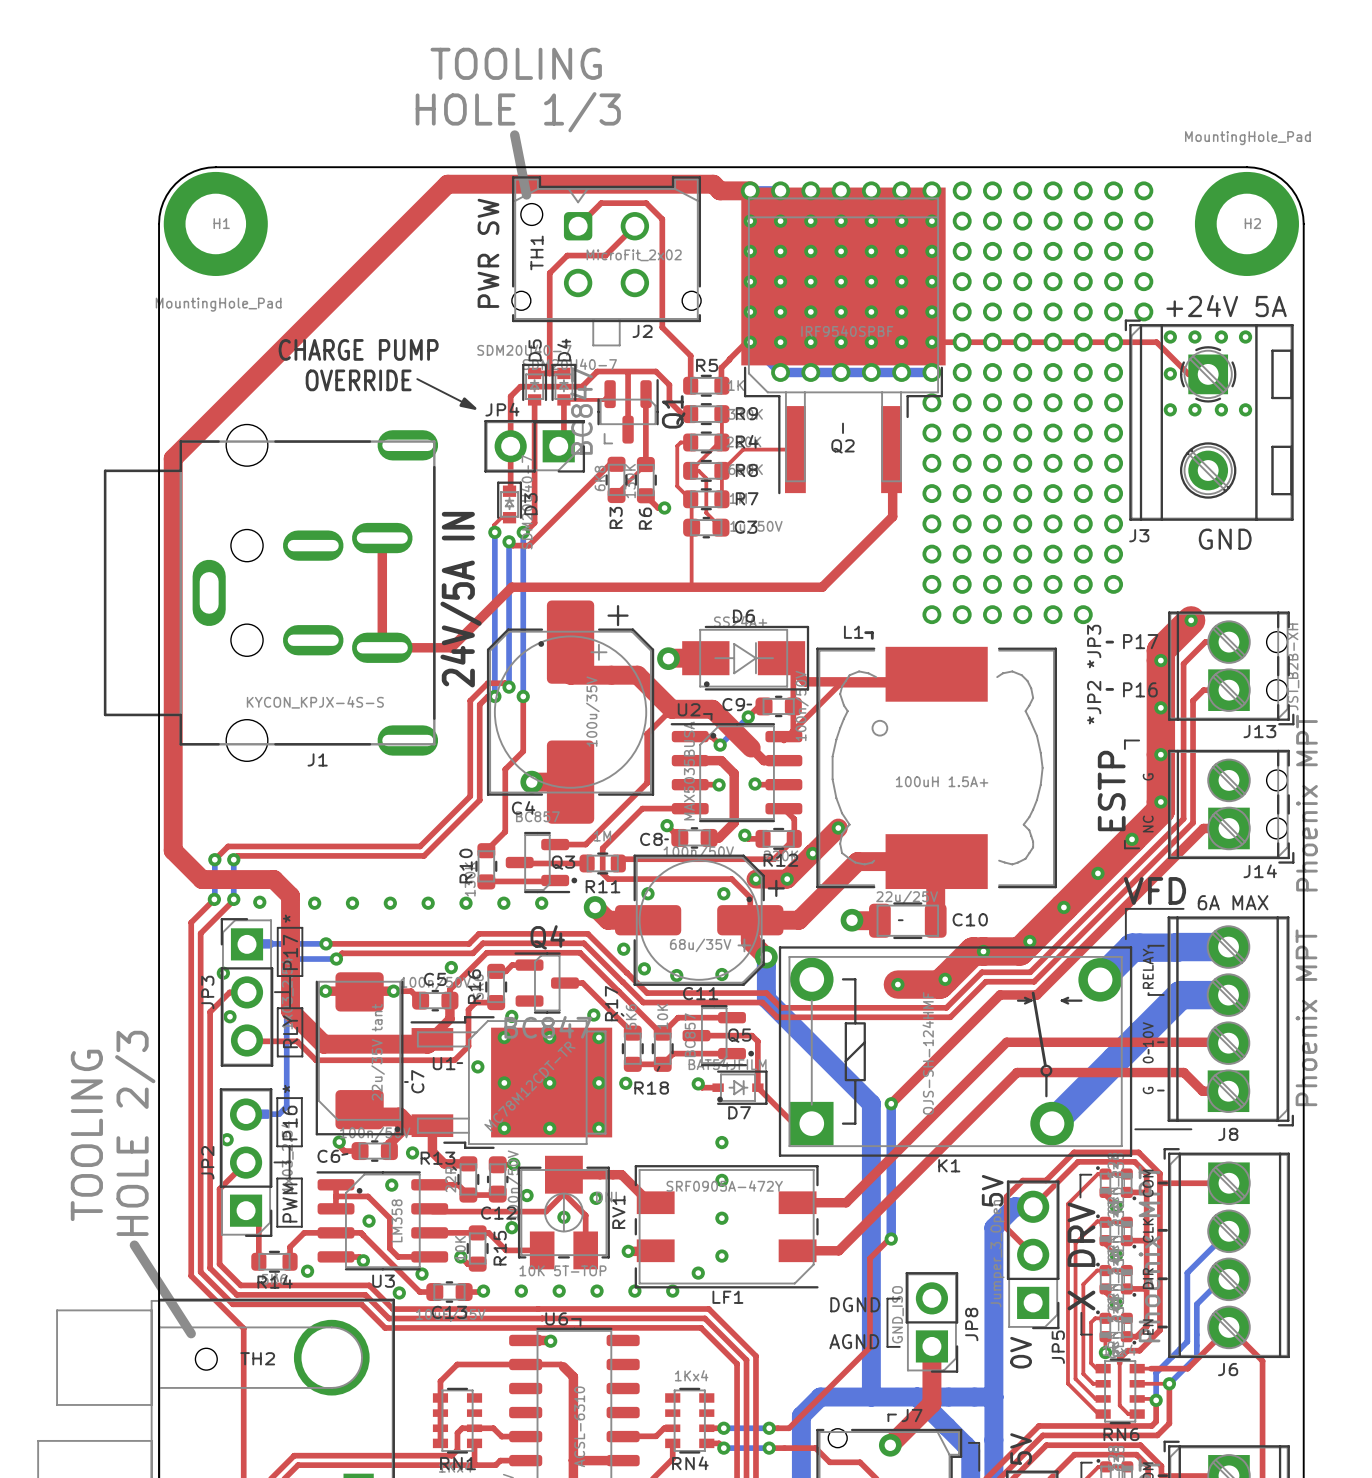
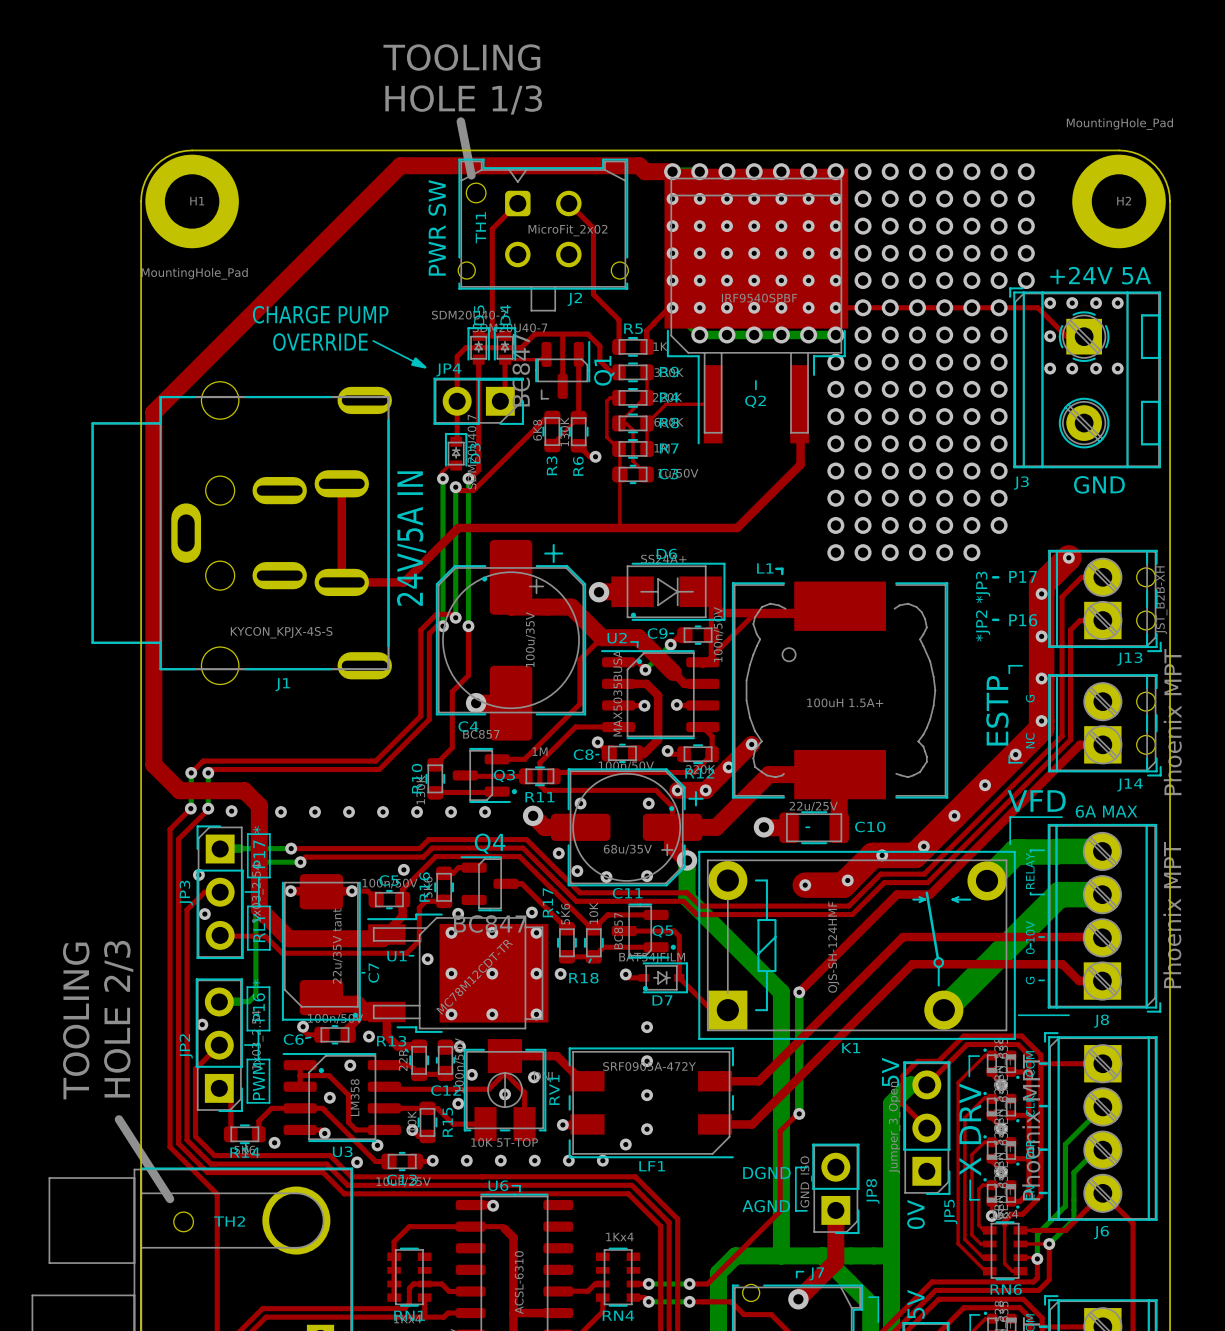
top track: (578, 226) (601, 203) (646, 203) (662, 219) (662, 253) -> (568, 203) (593, 228)
top track: (634, 226) (605, 255) (567, 255) (549, 273) -> (517, 203) (492, 229) (492, 245)

